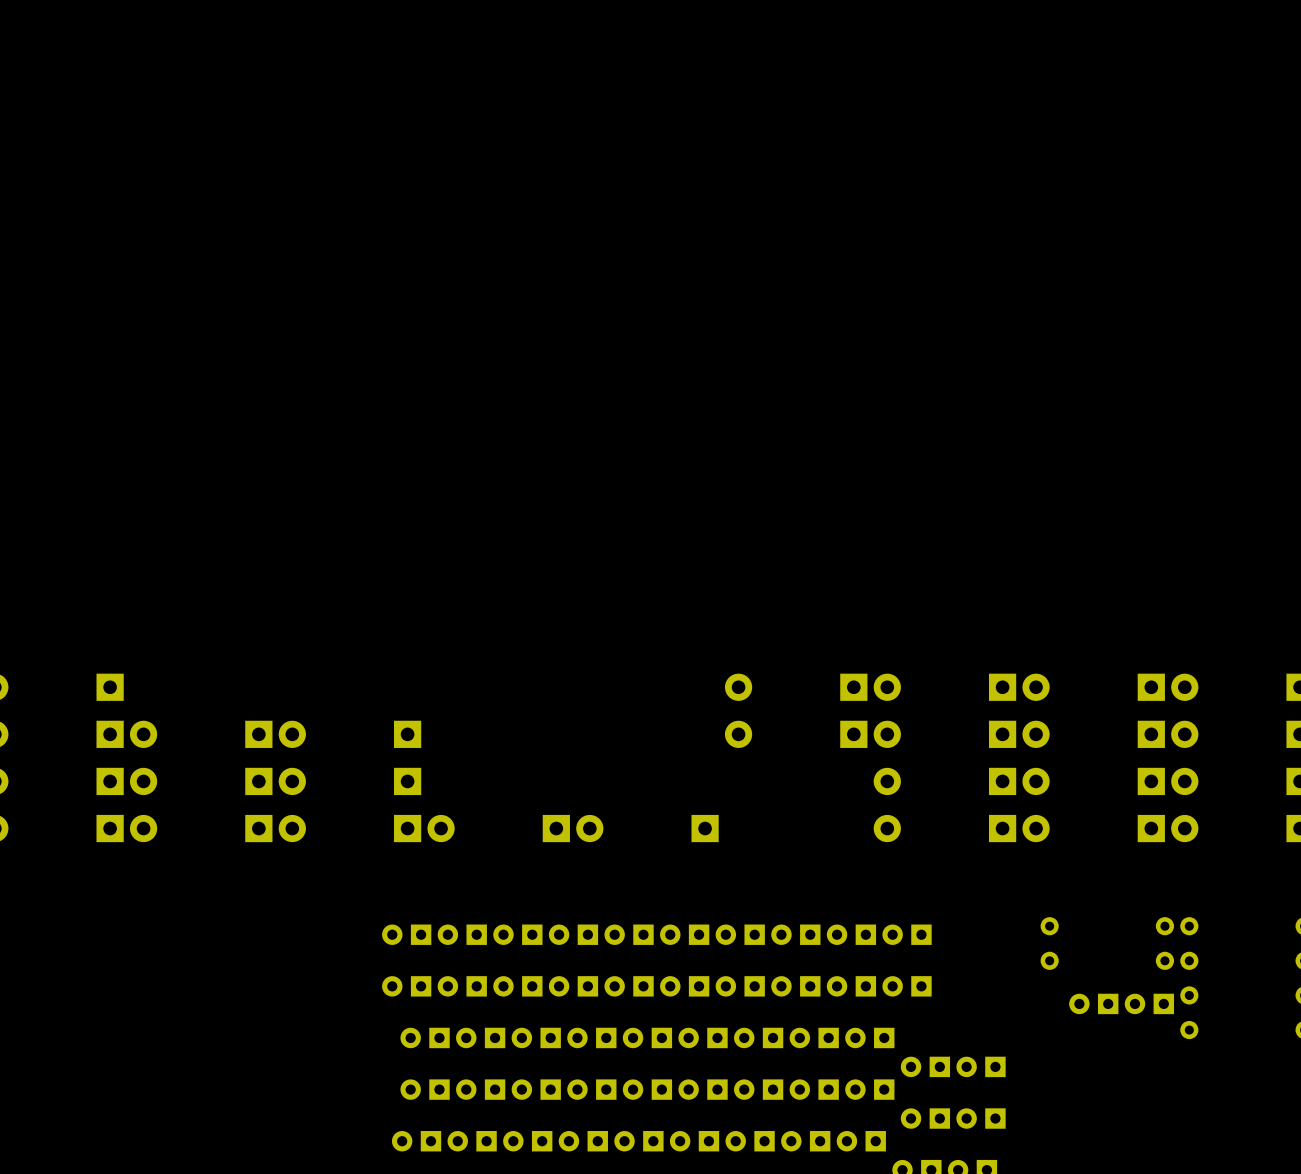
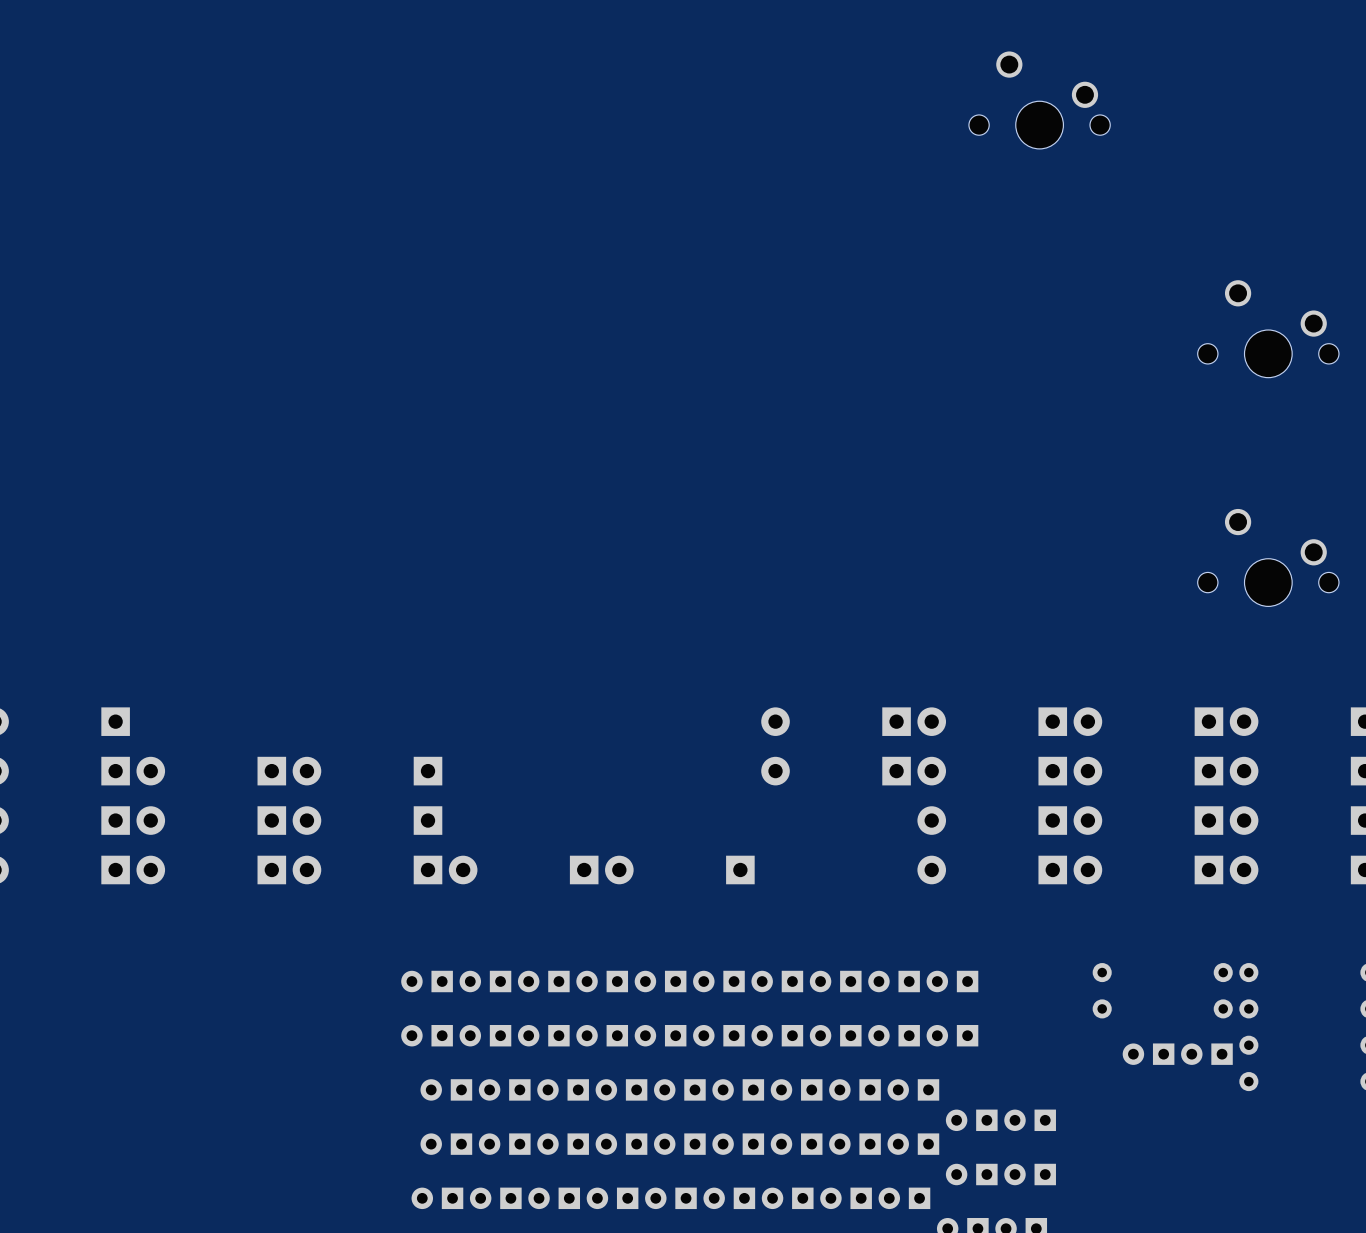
part: none -> (1039, 100)
part: none -> (1268, 328)
part: none -> (1268, 557)

